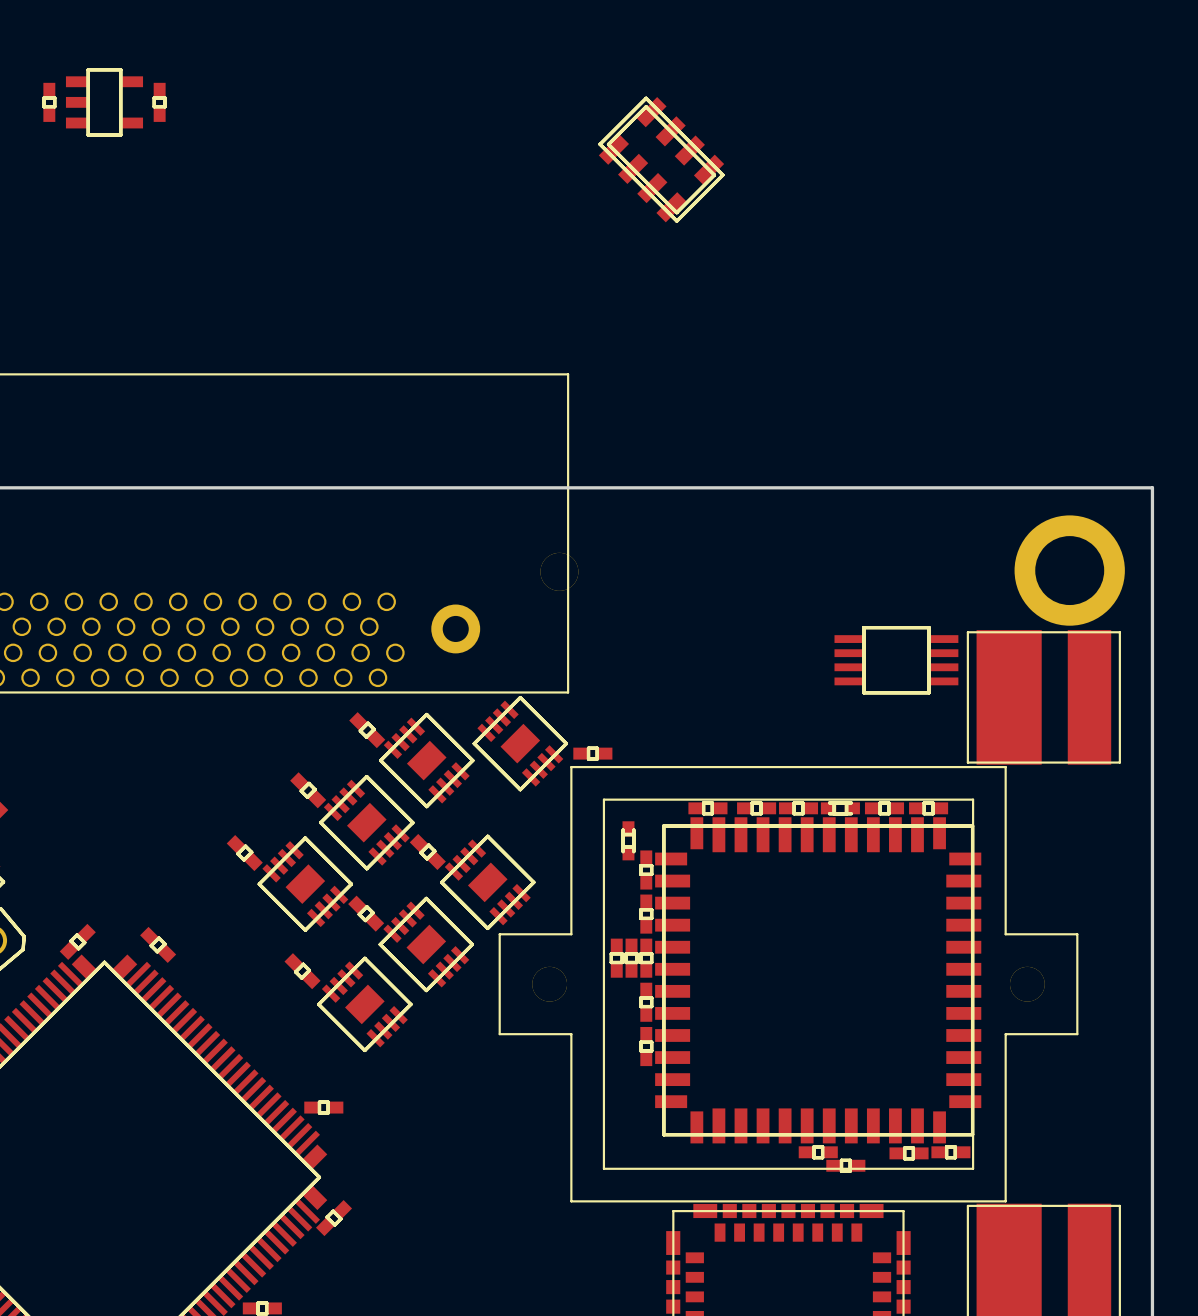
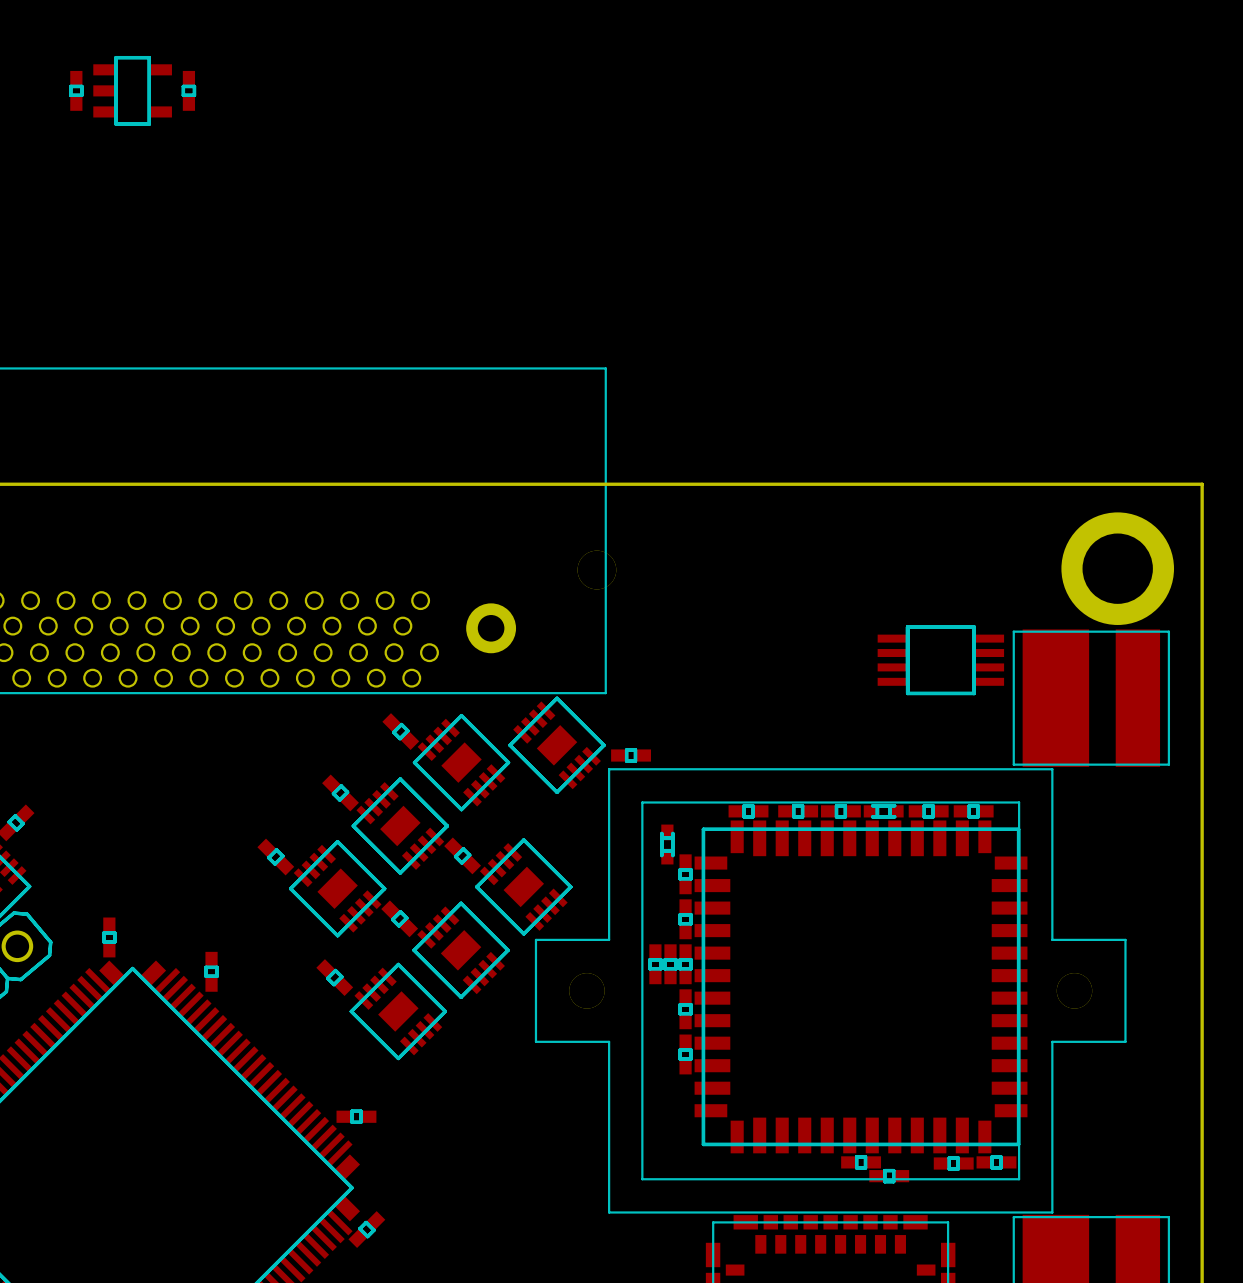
part: (661, 159) -> none
part rotation: 0° (77, 941) -> 45° counterclockwise (109, 937)
part: (158, 944) -> none
part: none -> (211, 971)

